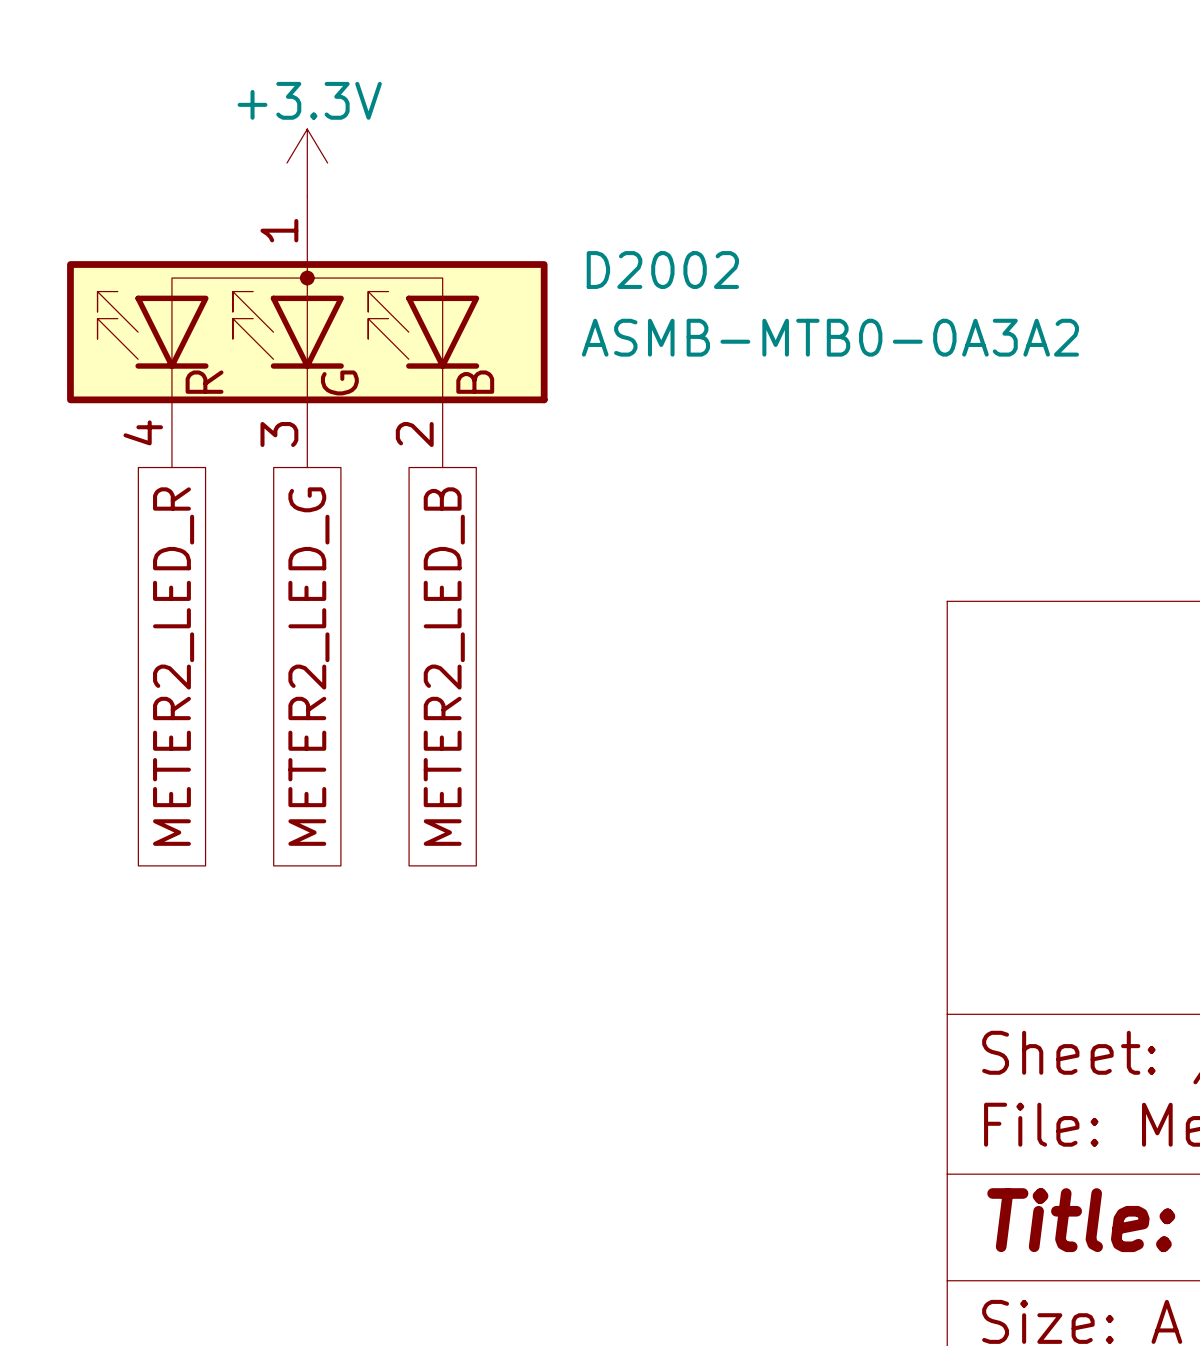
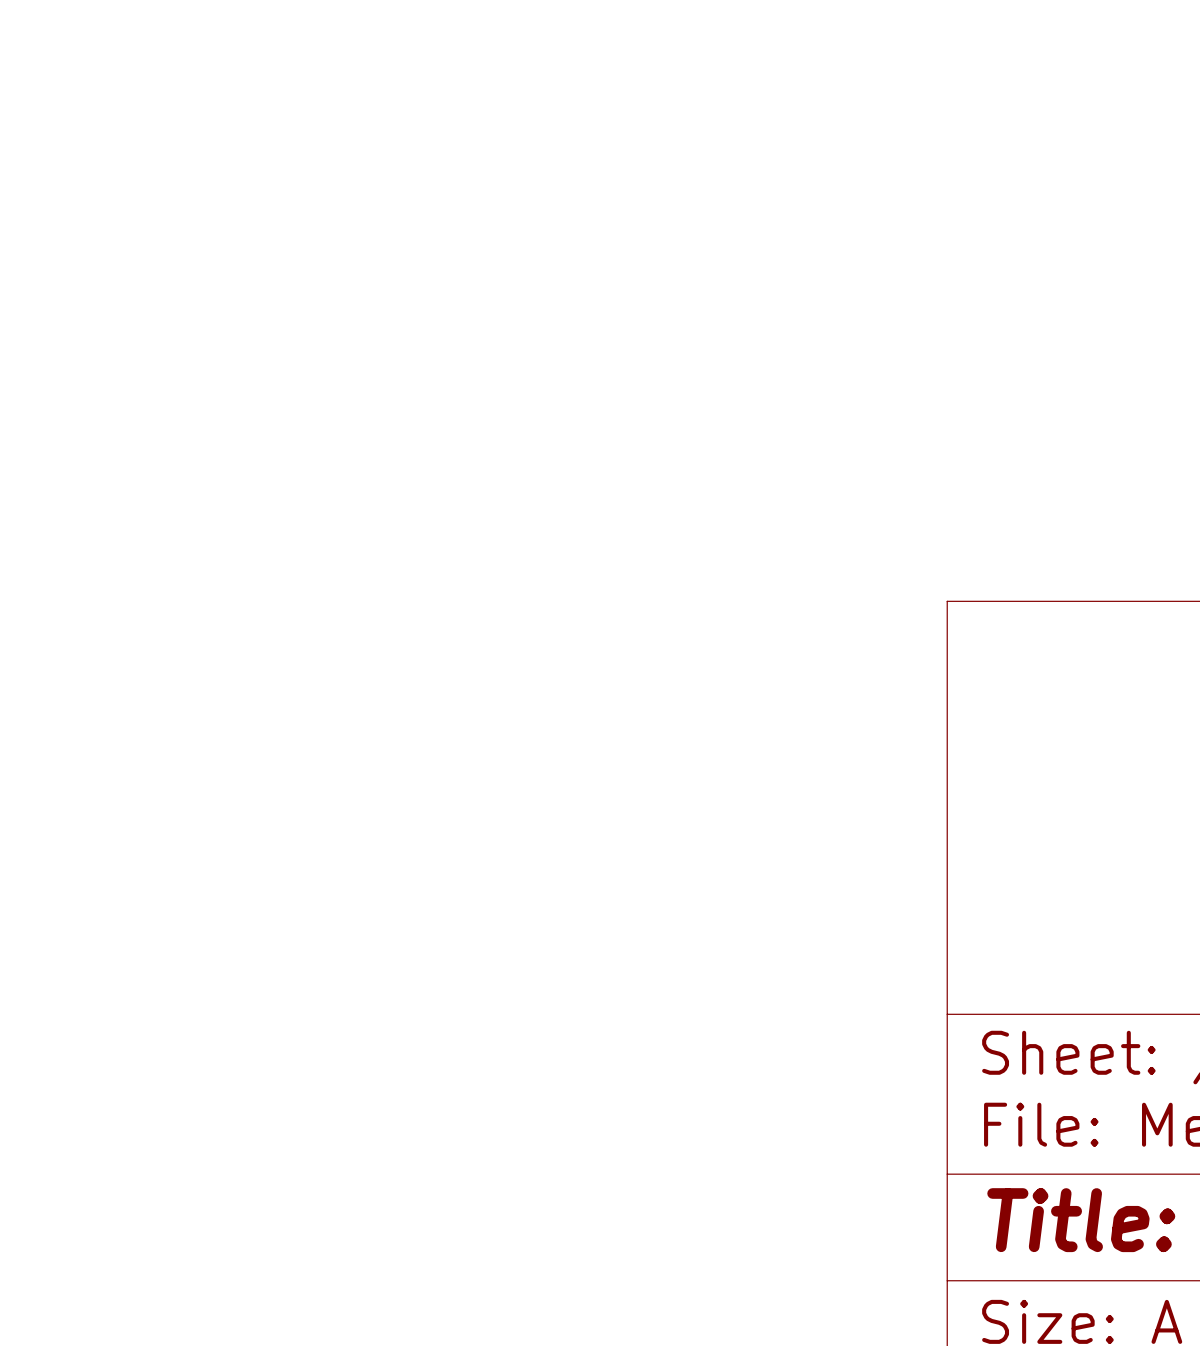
power symbol: +3.3V (307, 163) -> none
D2002: ASMB-MTB0-0A3A2 (307, 332) -> none
global label: METER2_LED_R (173, 666) -> none
global label: METER2_LED_G (308, 666) -> none
global label: METER2_LED_B (444, 666) -> none

